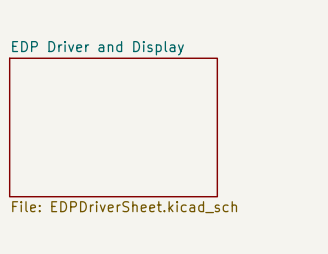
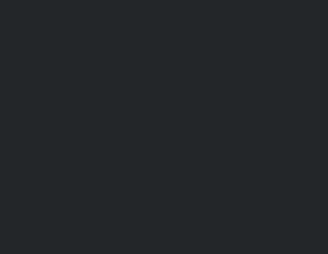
sheet EDP Driver and Display: File: EDPDriverSheet.kicad_sch (113, 127) -> none

